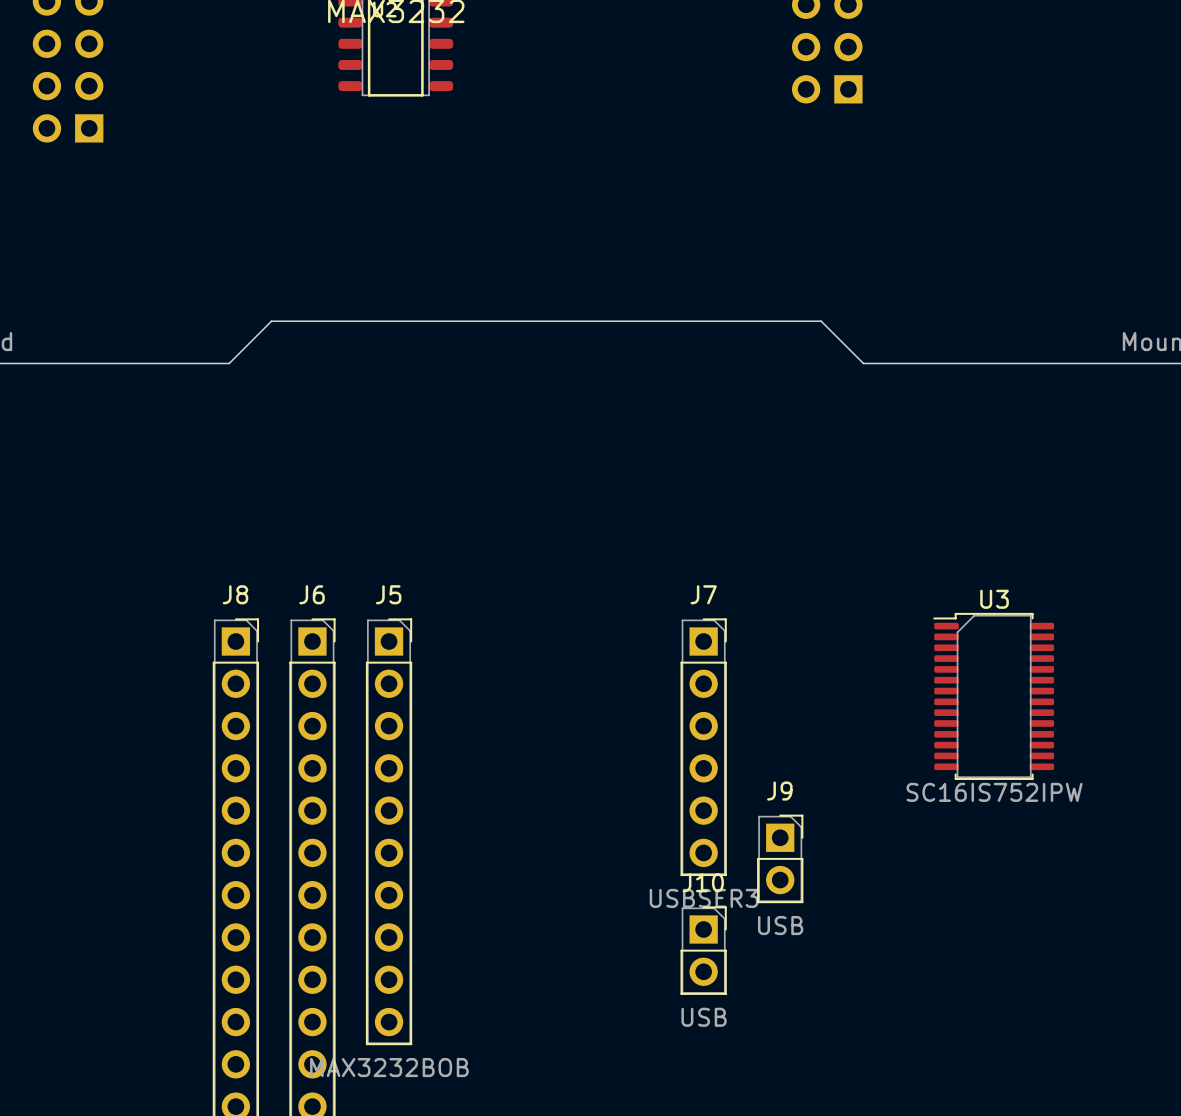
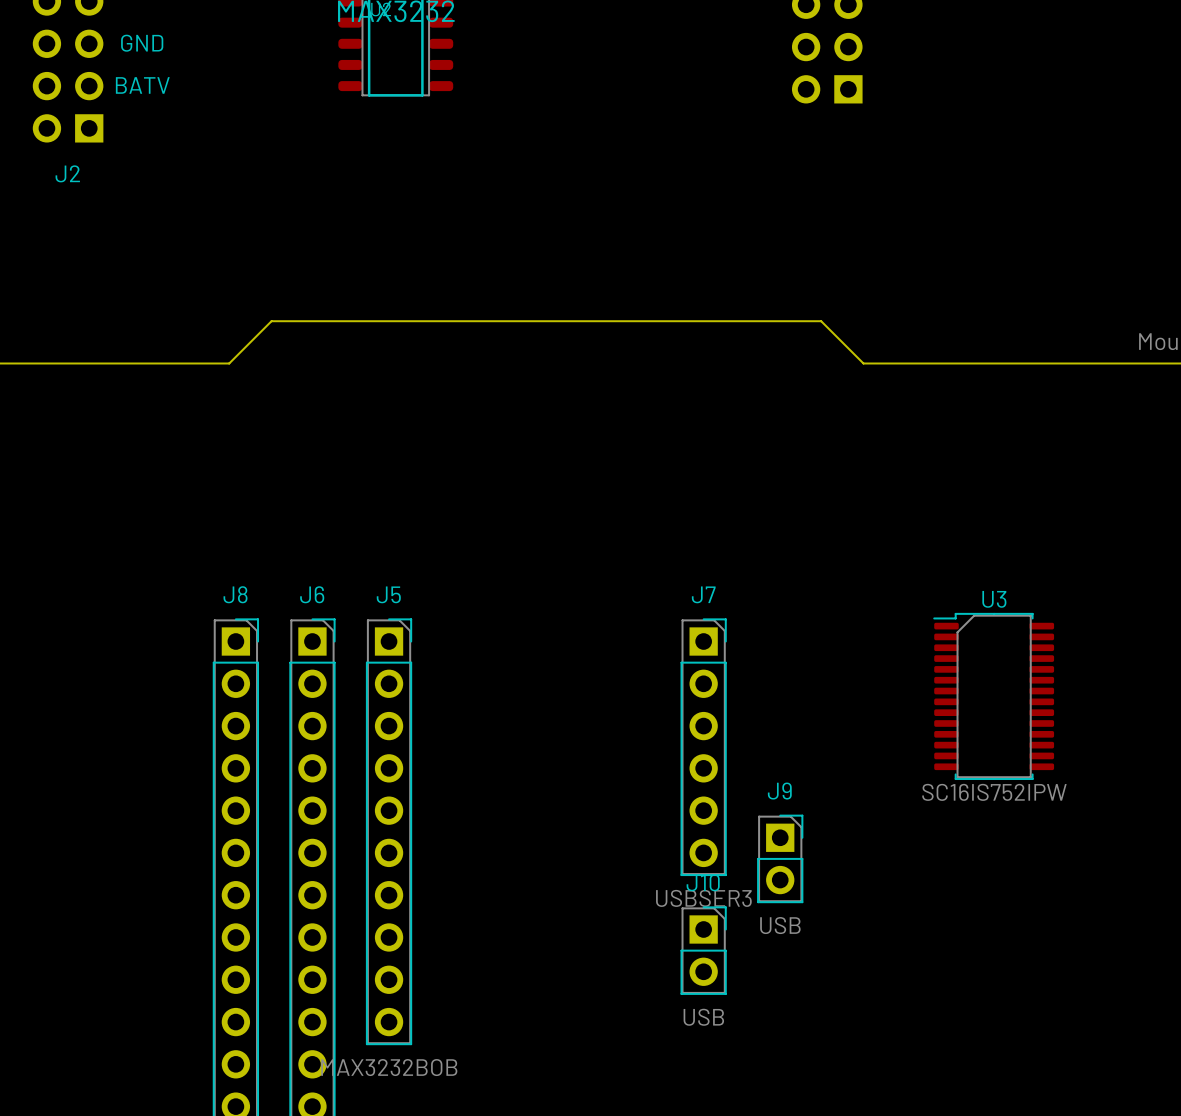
text: none -> GND (142, 43)
text: none -> BATV (142, 85)
J2 name: none -> J2 (67, 173)

